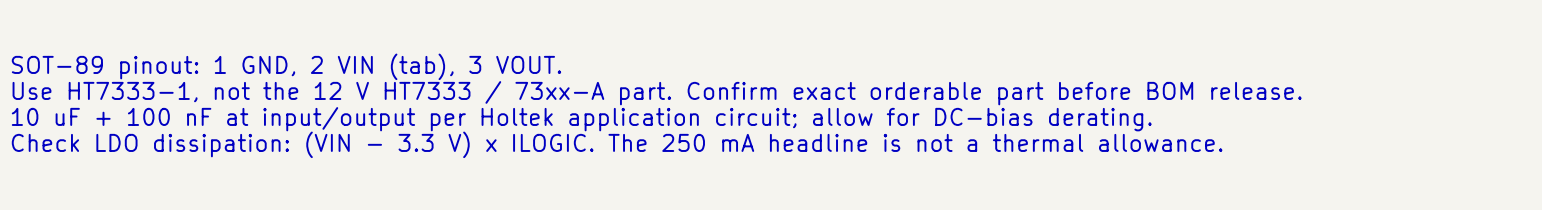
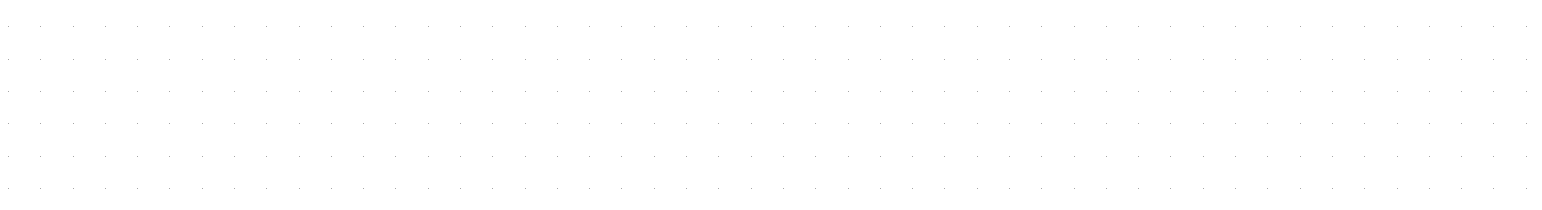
text: SOT-89 pinout: 1 GND, 2 VIN (tab), 3 VOUT. (286, 66) -> none
text: Use HT7333-1, not the 12 V HT7333 / 73xx-A part. Confirm exact orderable part before BOM release. (657, 93) -> none
text: 10 uF + 100 nF at input/output per Holtek application circuit; allow for DC-bias derating. (581, 119) -> none
text: Check LDO dissipation: (VIN - 3.3 V) x ILOGIC. The 250 mA headline is not a thermal allowance. (617, 144) -> none

